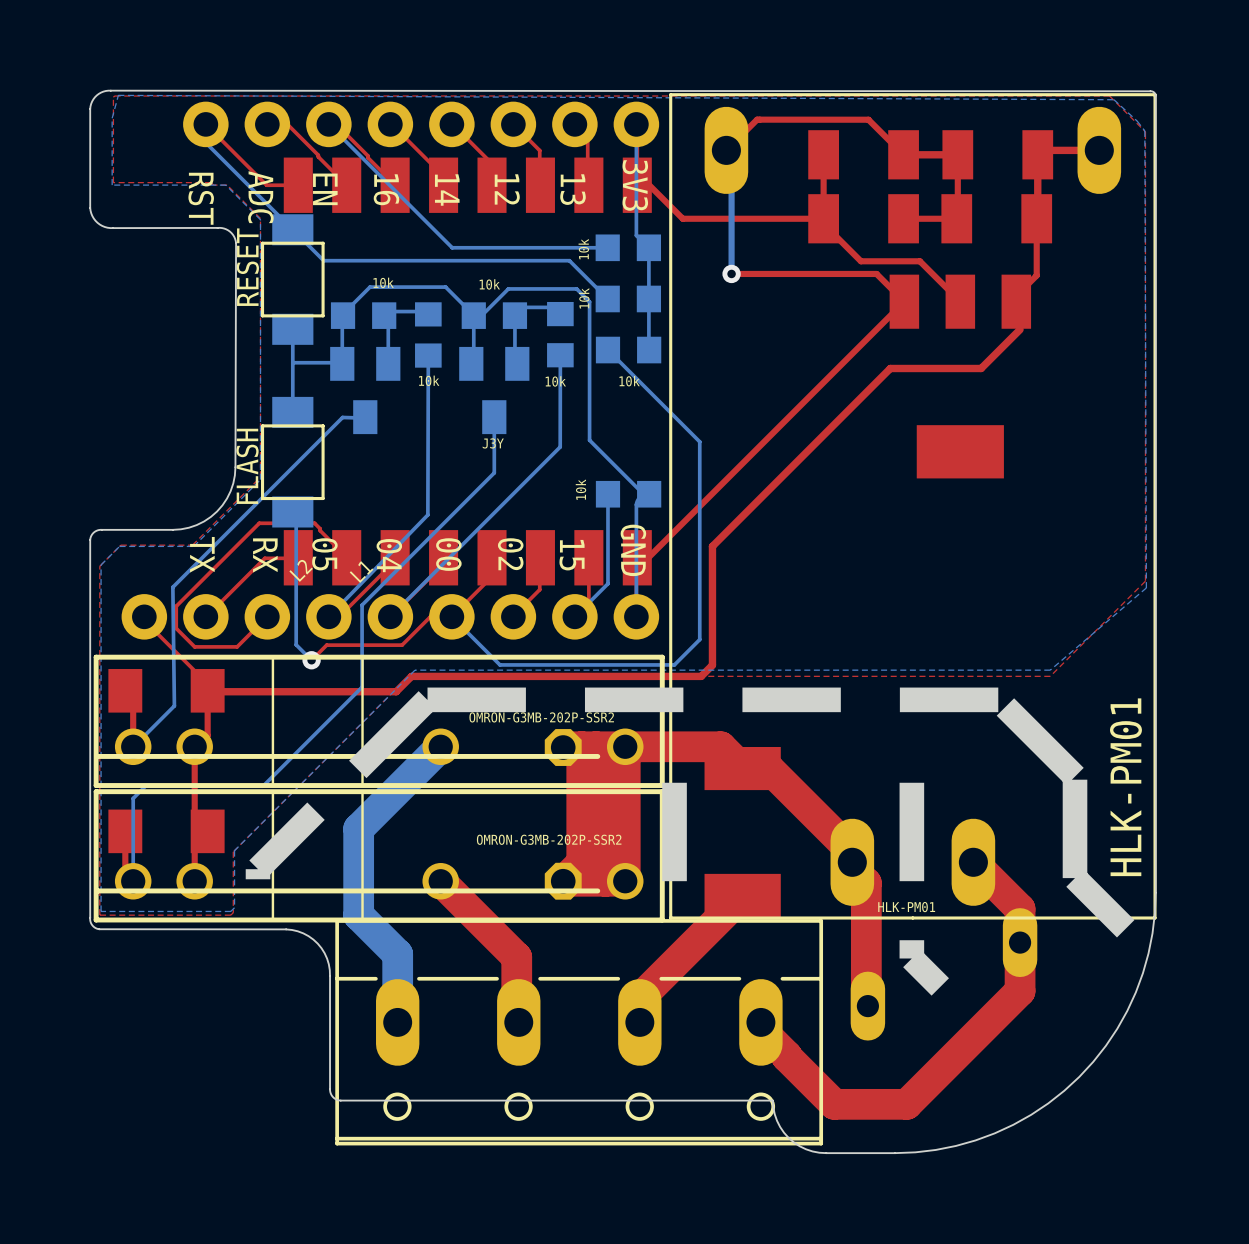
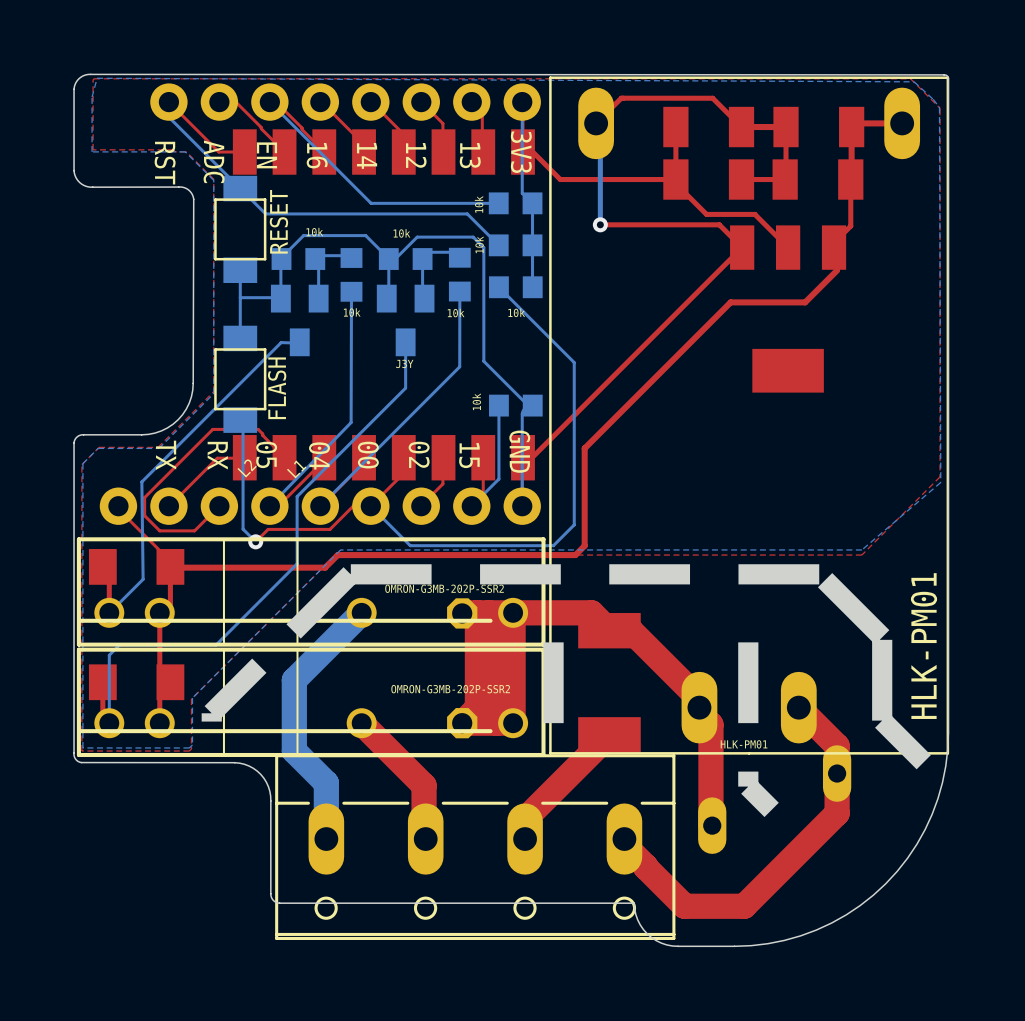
RESET name position: RESET (247, 267) -> RESET (278, 221)
FLASH name position: FLASH (247, 466) -> FLASH (277, 388)

